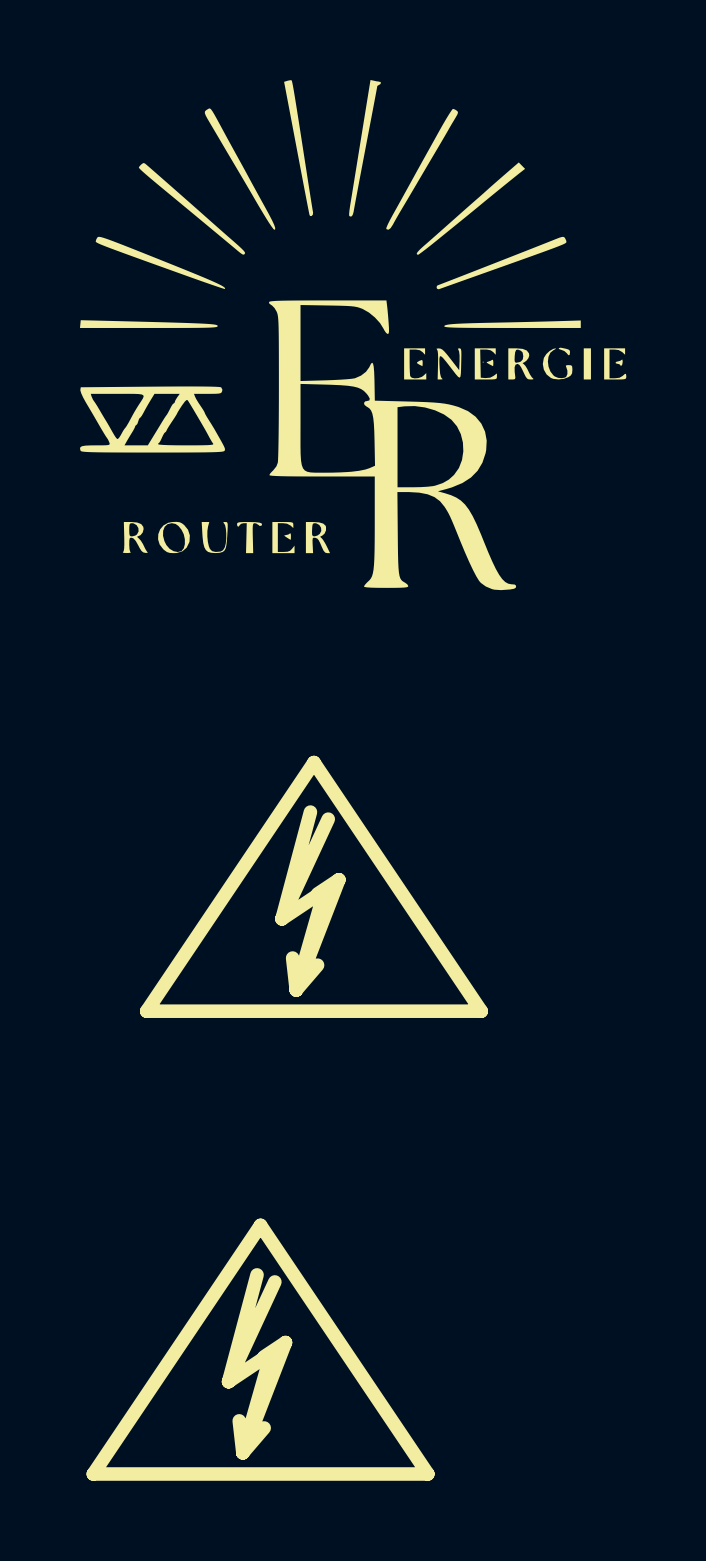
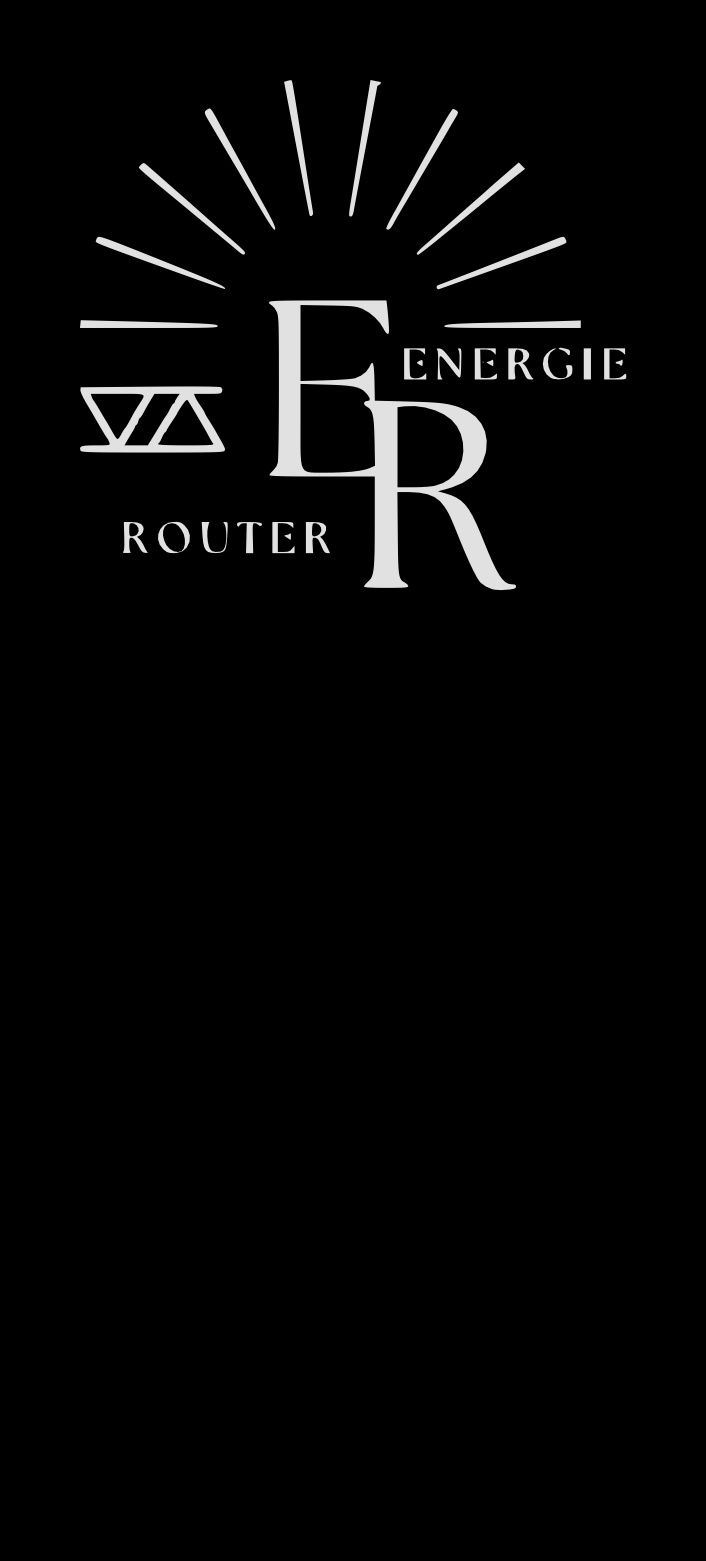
drawing: [139, 755, 489, 1018] -> none
drawing: [86, 1218, 435, 1481] -> none

